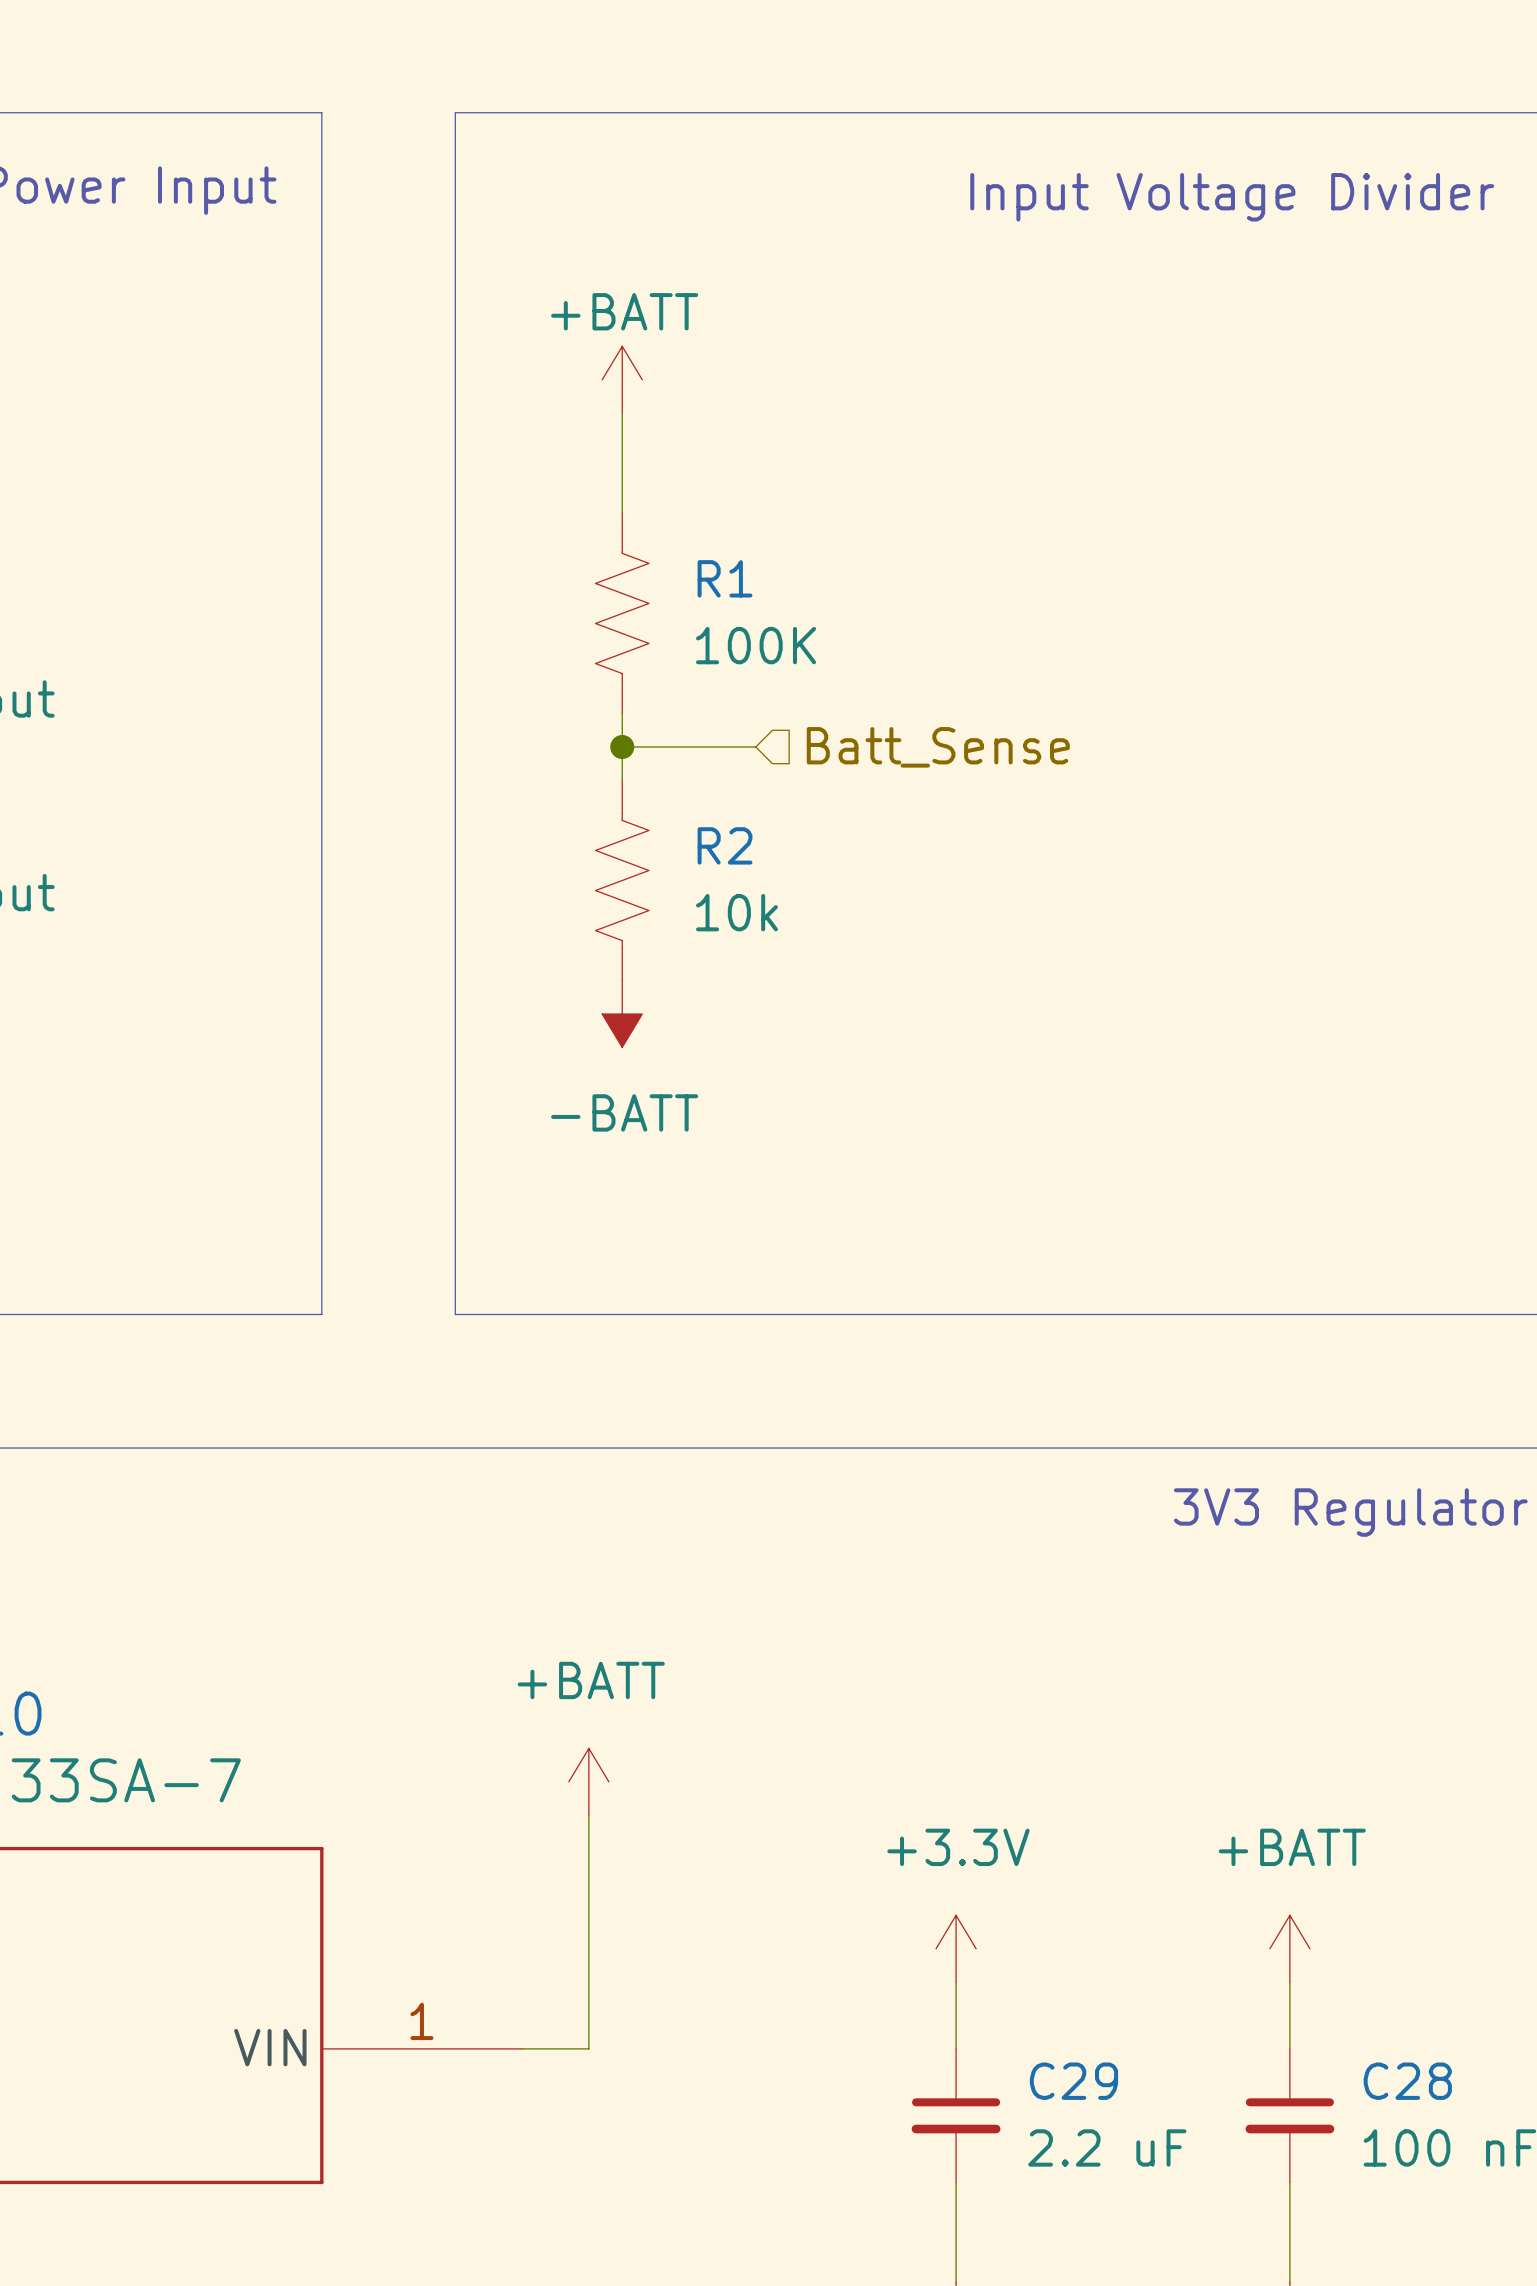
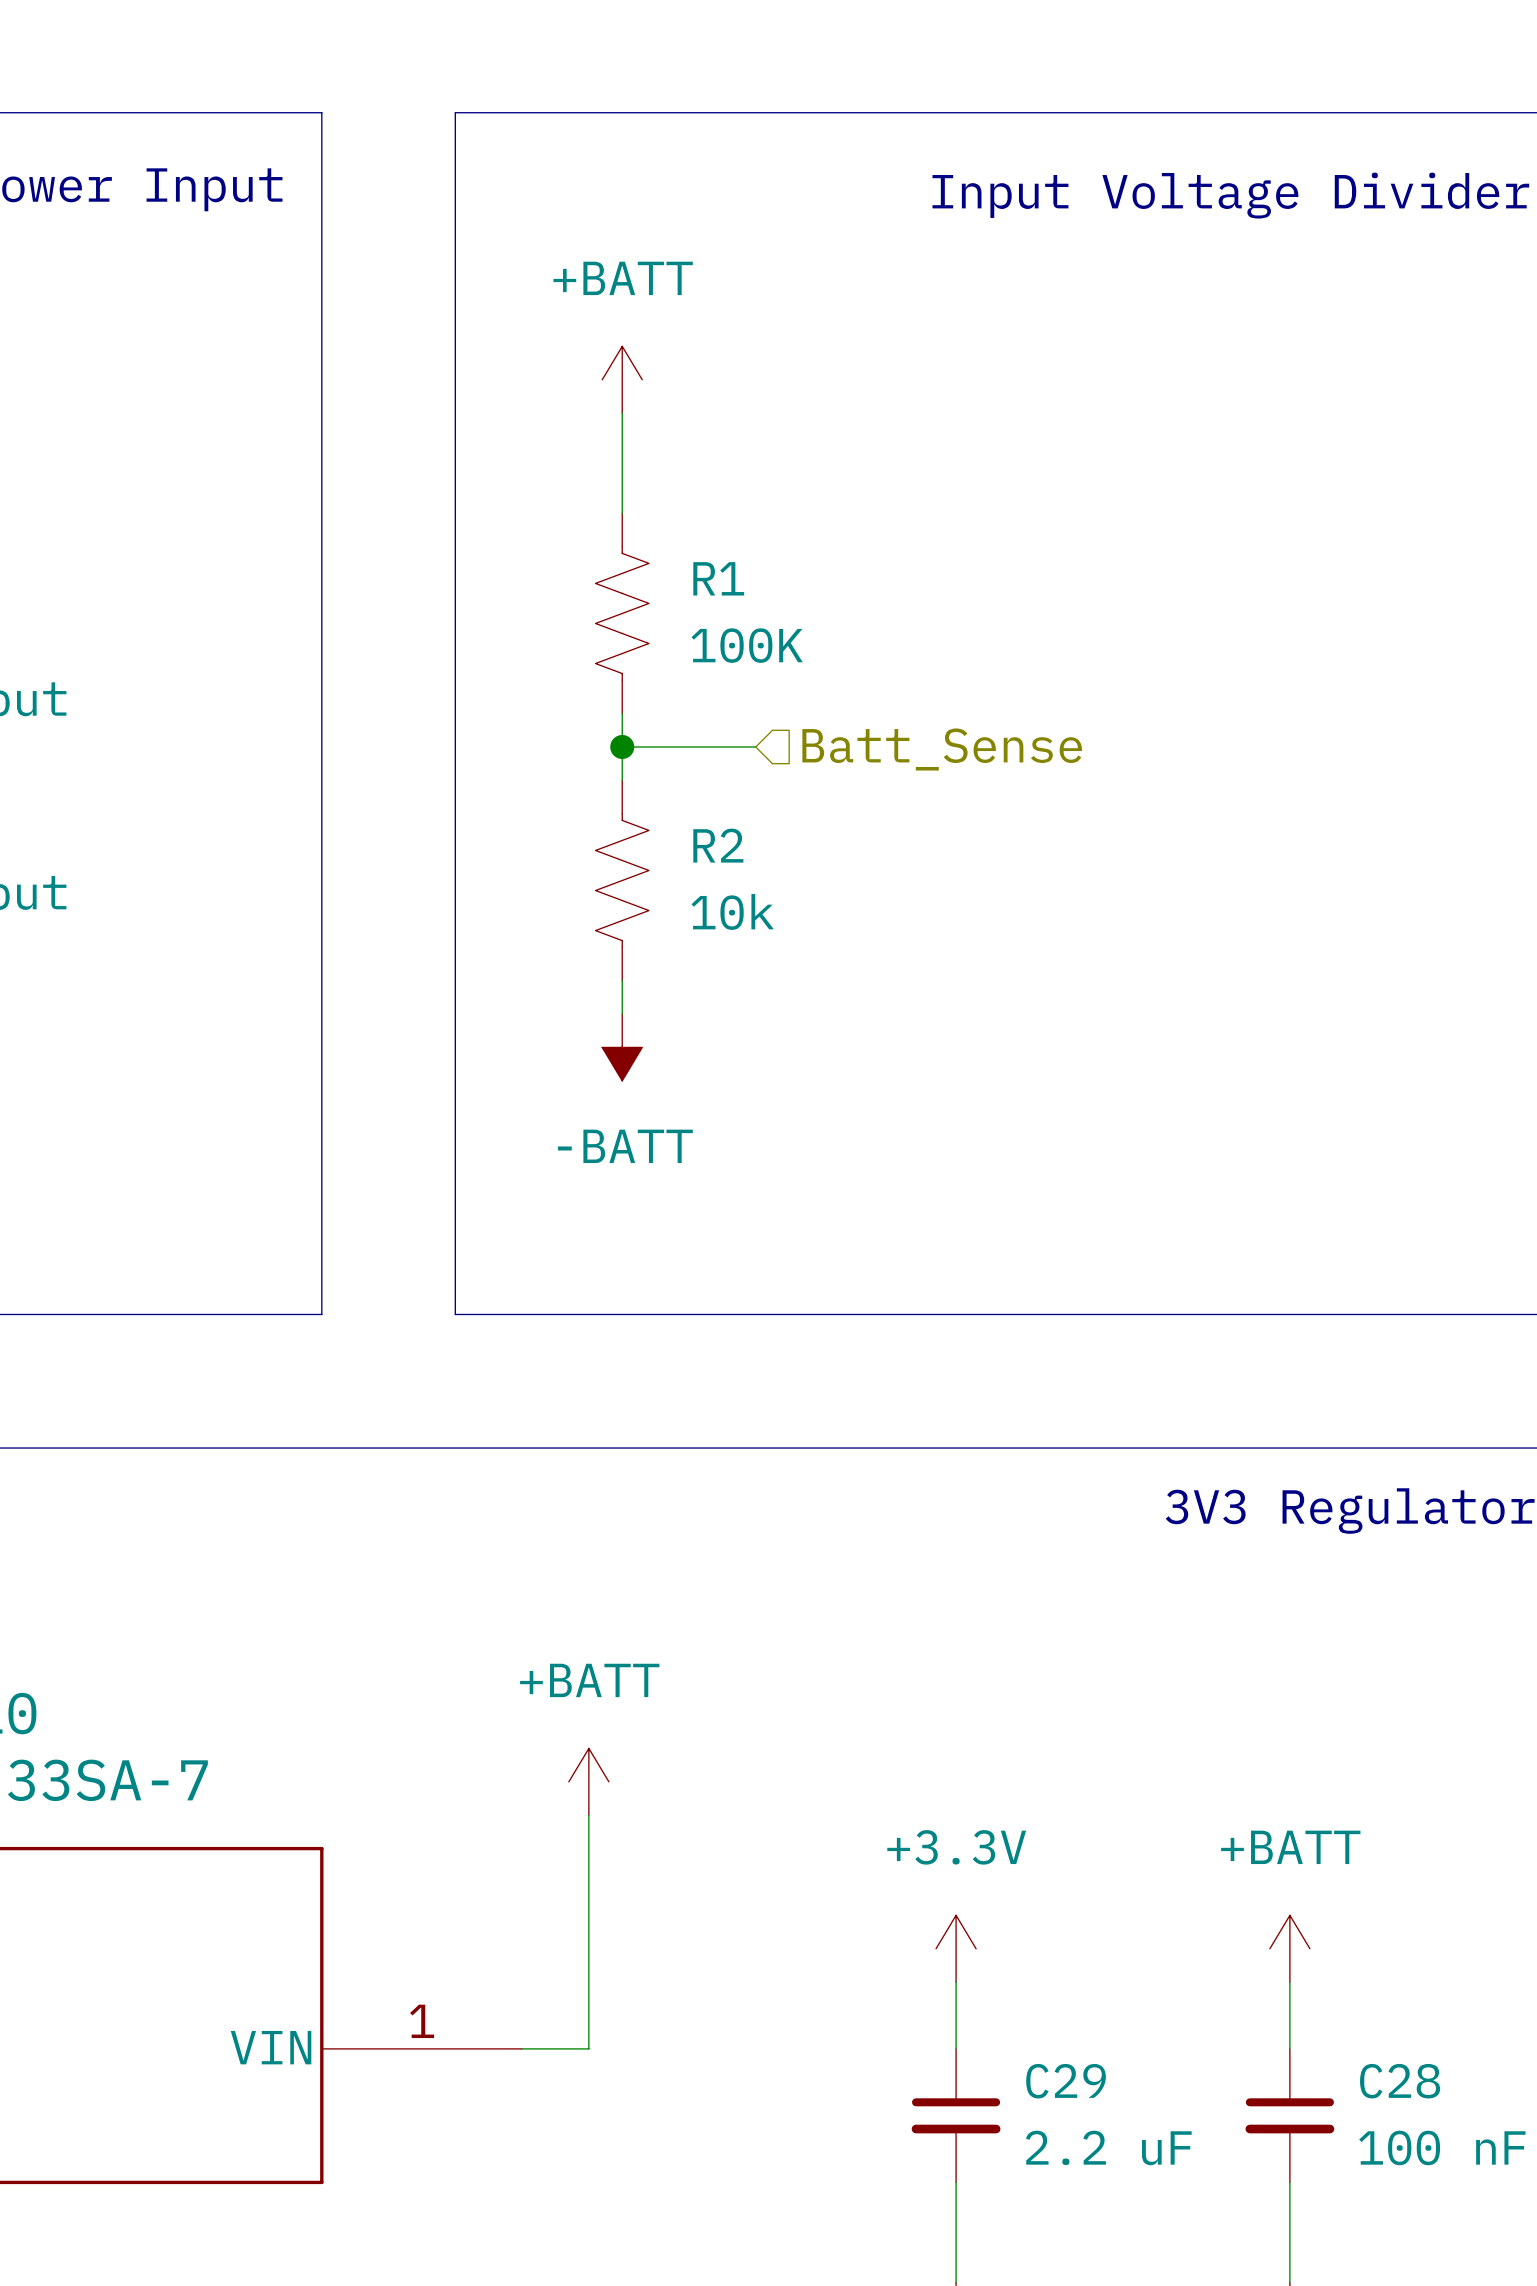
power symbol text position: +BATT (624, 311) -> +BATT (623, 278)
power symbol position: -BATT (622, 1014) -> -BATT (622, 1047)

